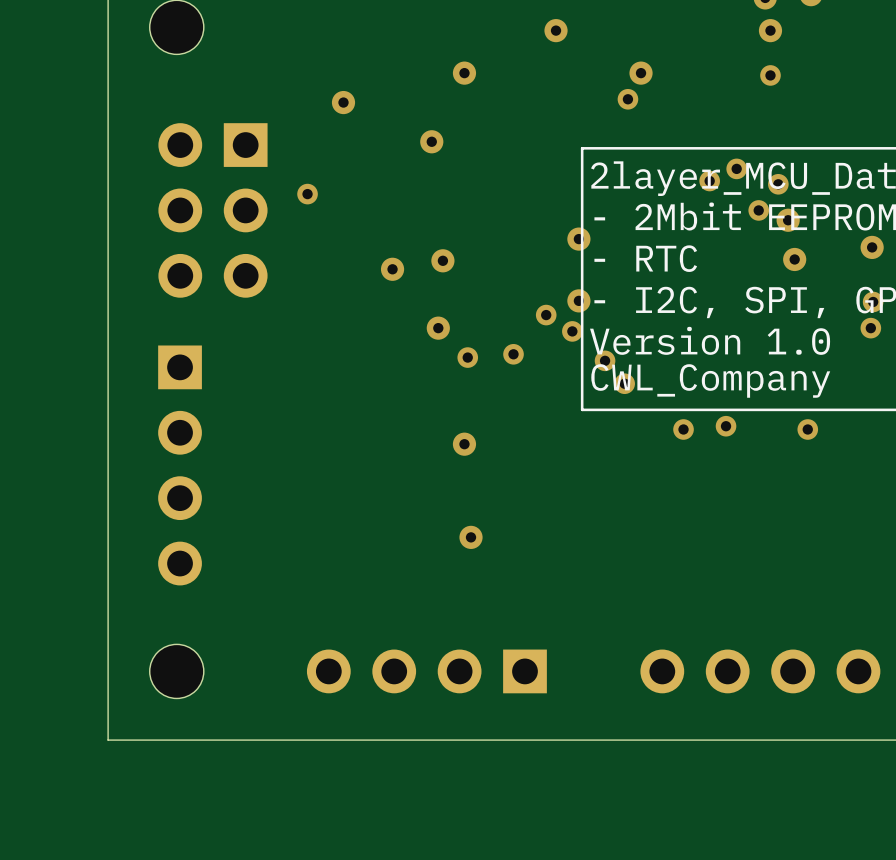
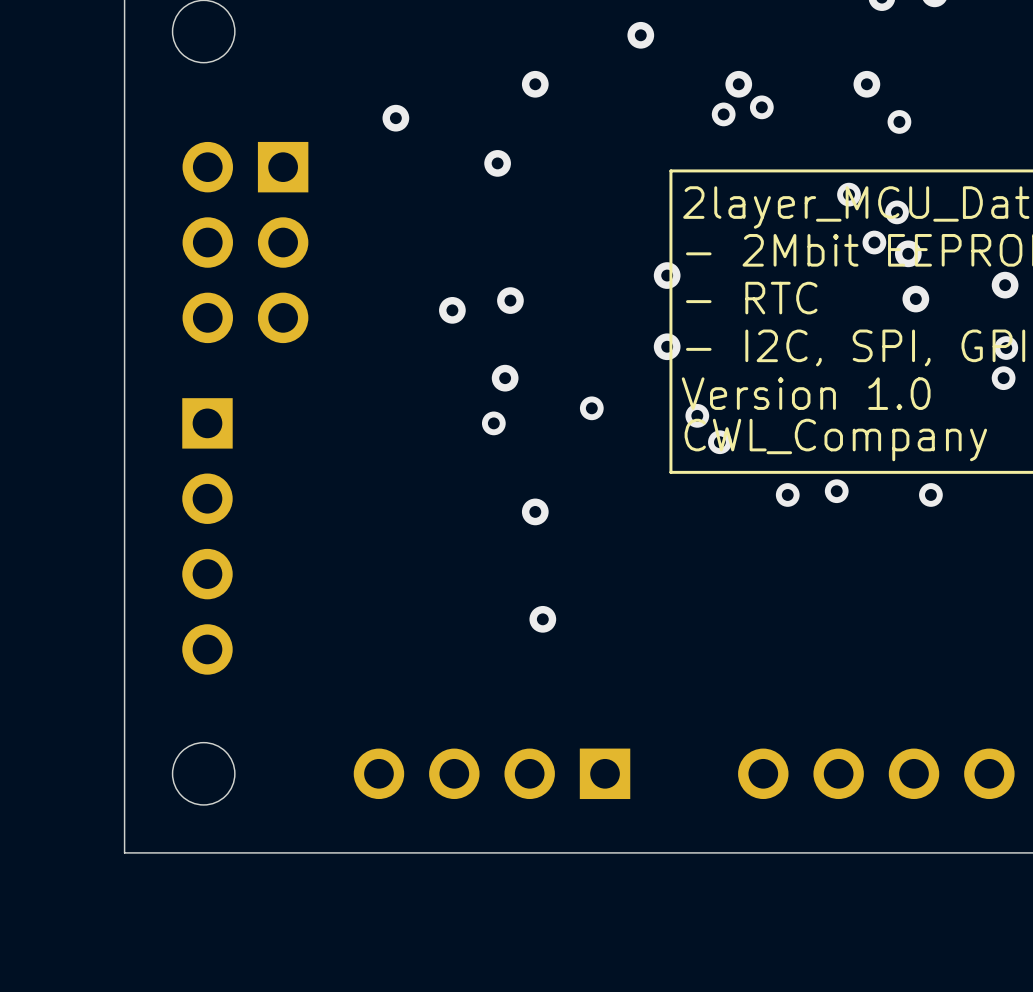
via position: (770, 30) -> (866, 84)
via position: (770, 75) -> (899, 121)
via: none -> (761, 107)
via: (709, 181) -> none
via: (307, 194) -> none
via: (546, 315) -> none
via: (572, 331) -> none
via position: (467, 357) -> (493, 423)

